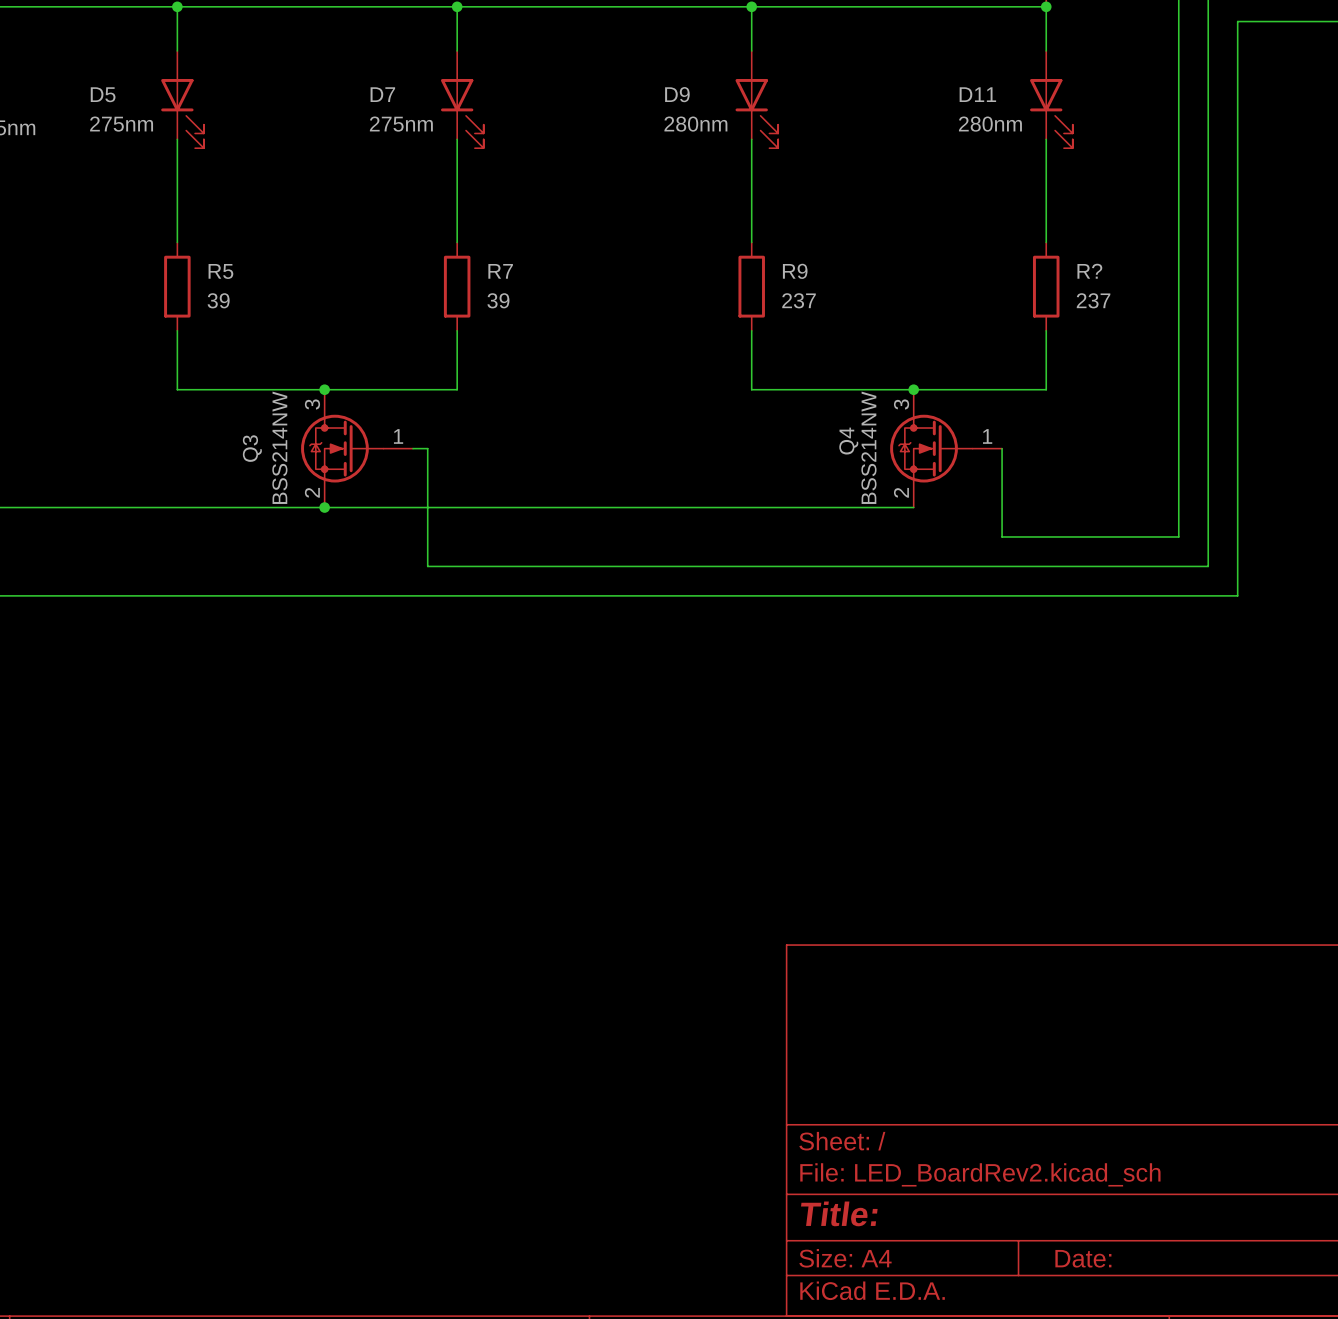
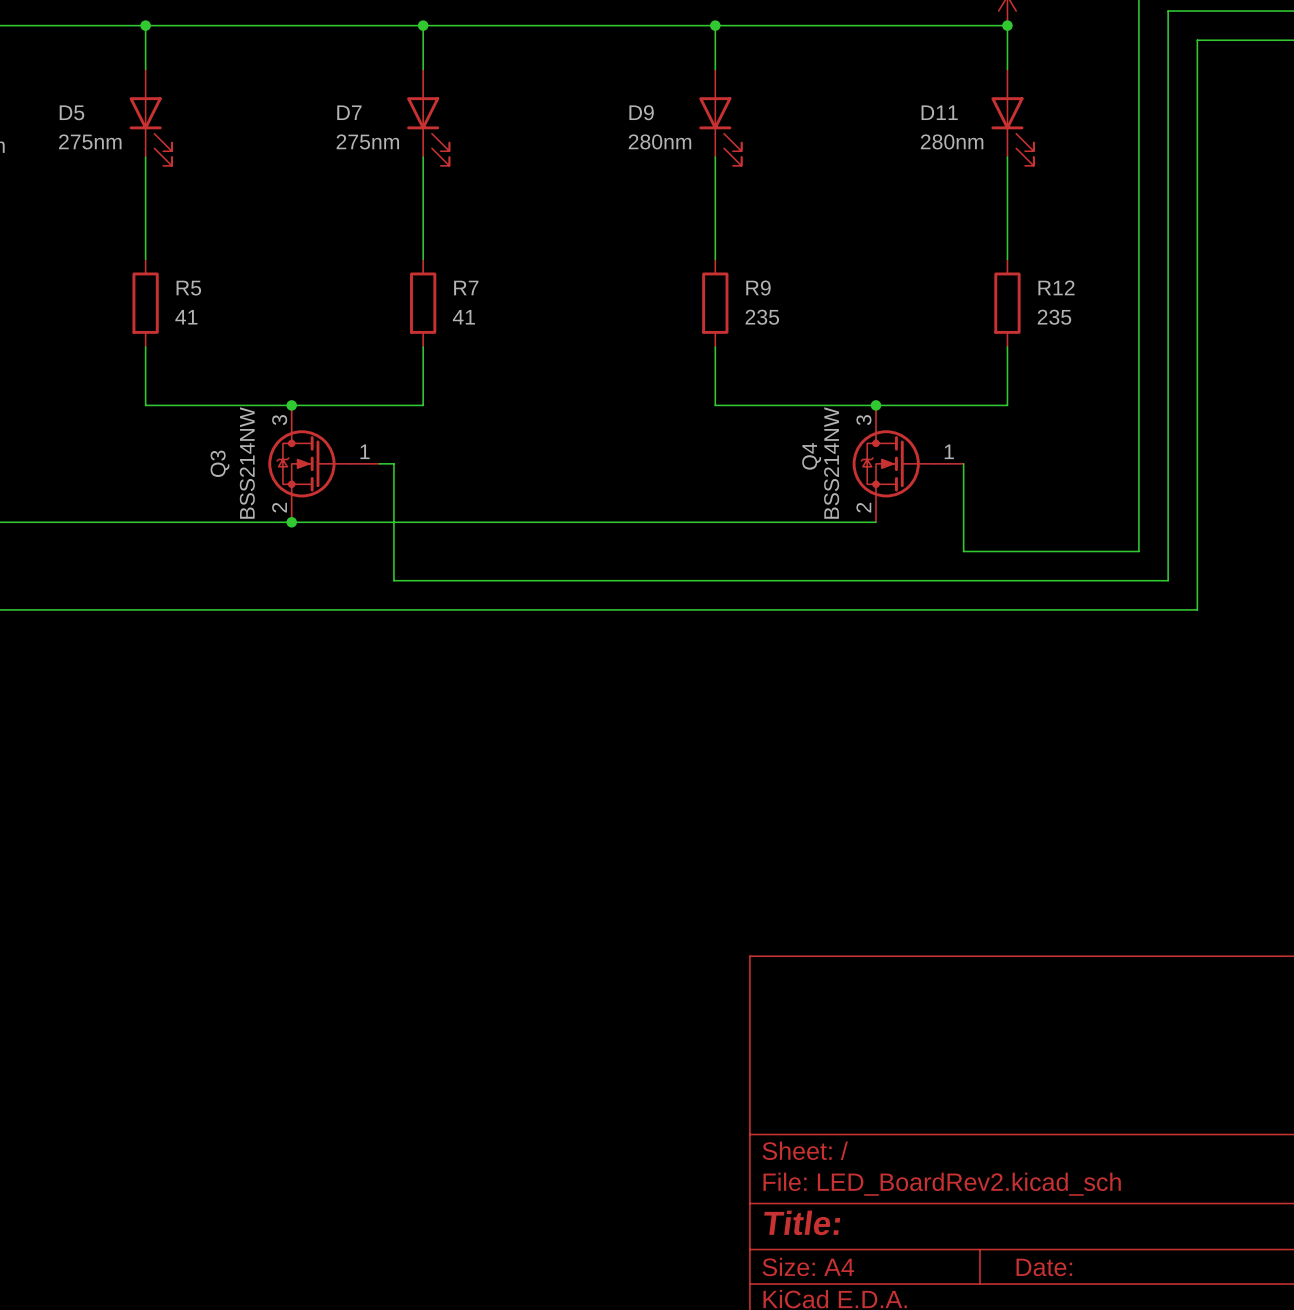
R? name: R? (1089, 271) -> R12 (1056, 287)
R5 value: 39 (218, 300) -> 41 (186, 317)
R7 value: 39 (498, 300) -> 41 (463, 317)
R9 value: 237 (799, 300) -> 235 (762, 317)
R? value: 237 (1093, 300) -> 235 (1054, 317)

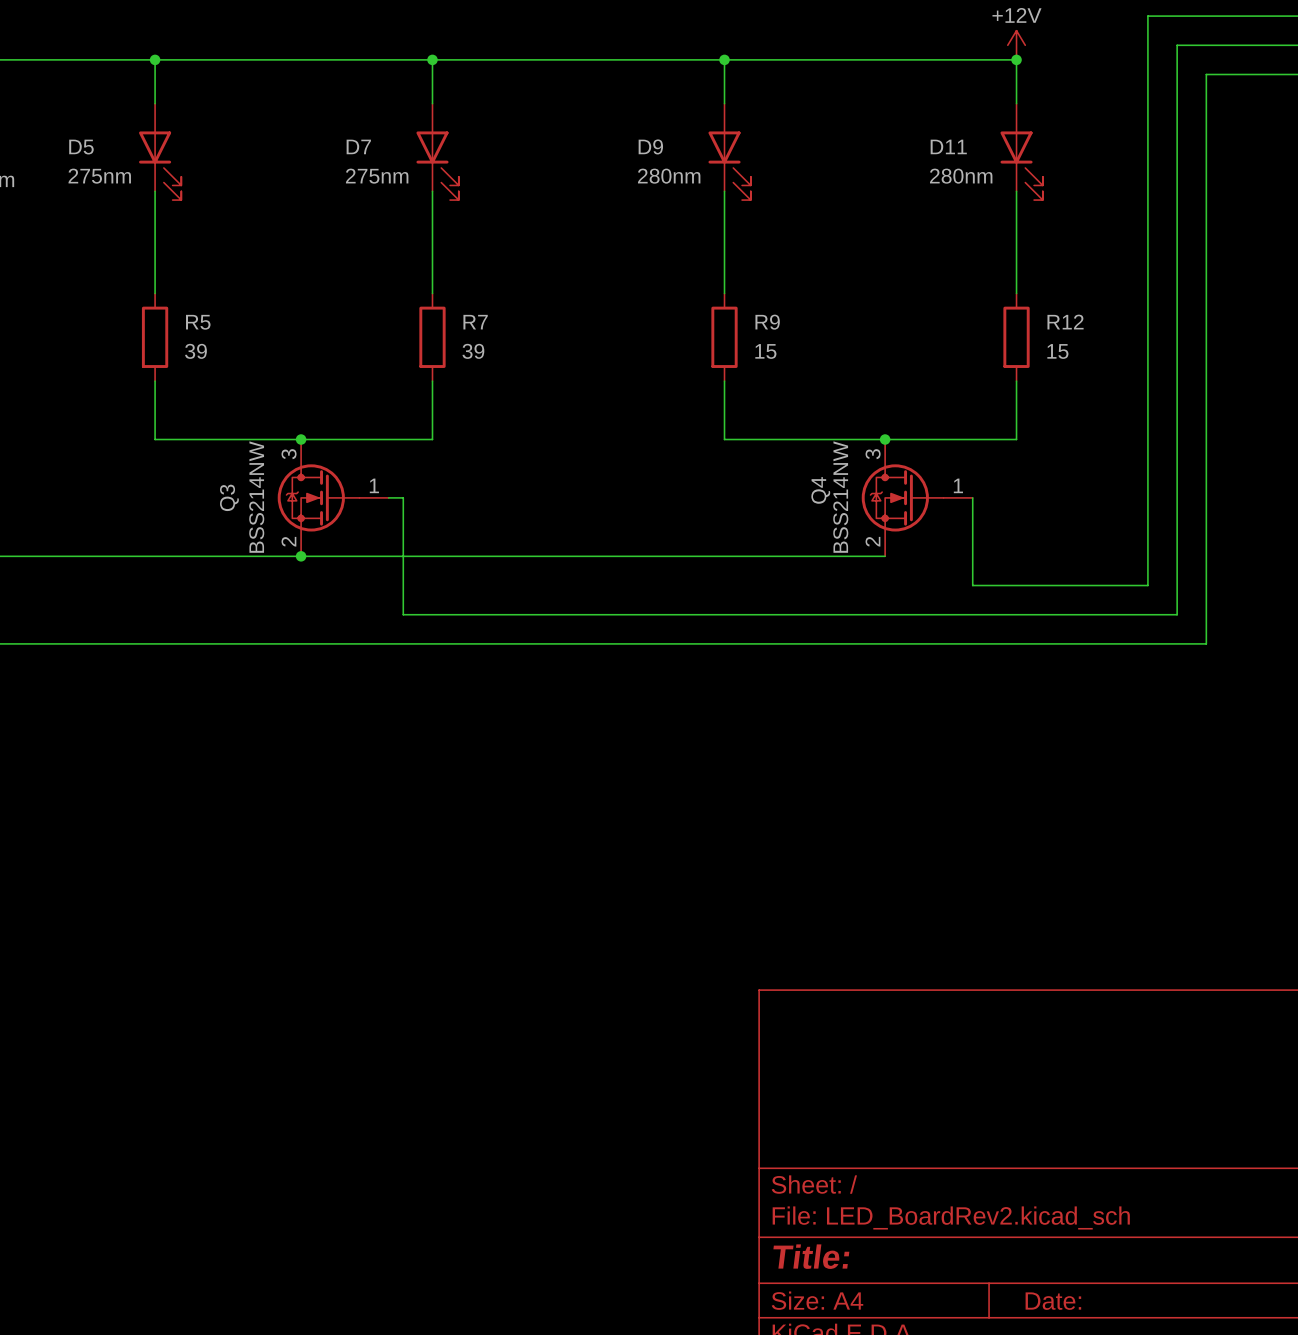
R5 value: 41 (186, 317) -> 39 (195, 351)
R7 value: 41 (463, 317) -> 39 (473, 351)
R9 value: 235 (762, 317) -> 15 (765, 351)
R12 value: 235 (1054, 317) -> 15 (1057, 351)

